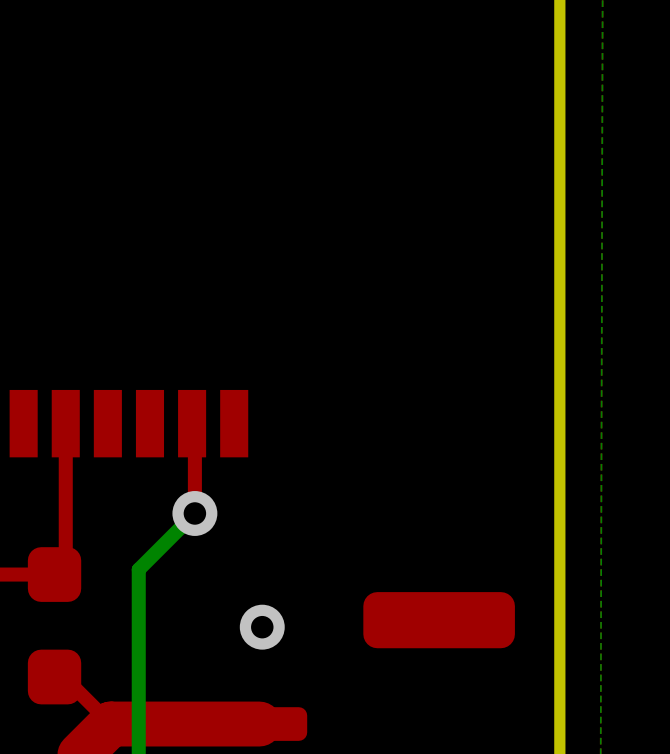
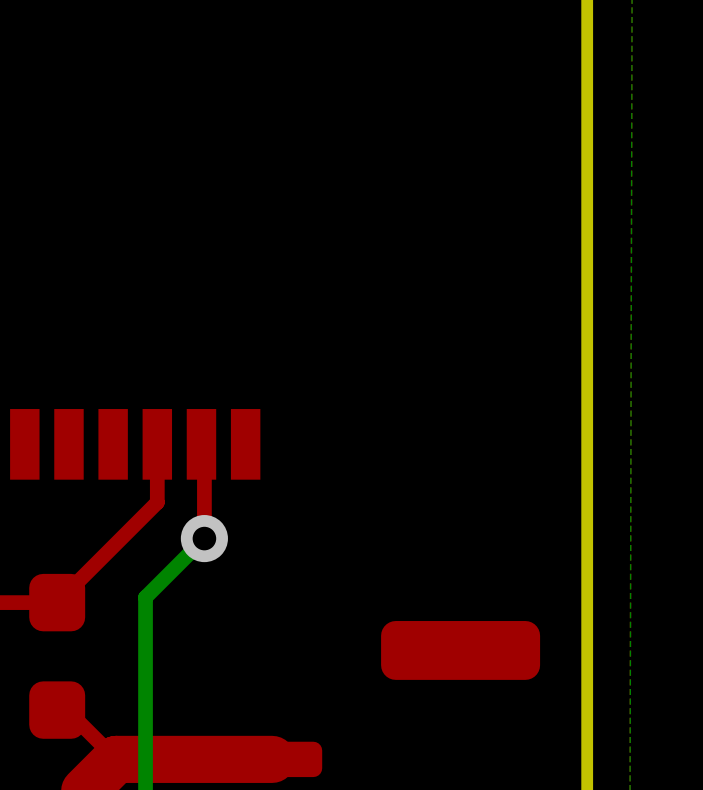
top track: (65, 423) (65, 563) -> (157, 444) (157, 502) (68, 590)
via: (262, 627) -> none

